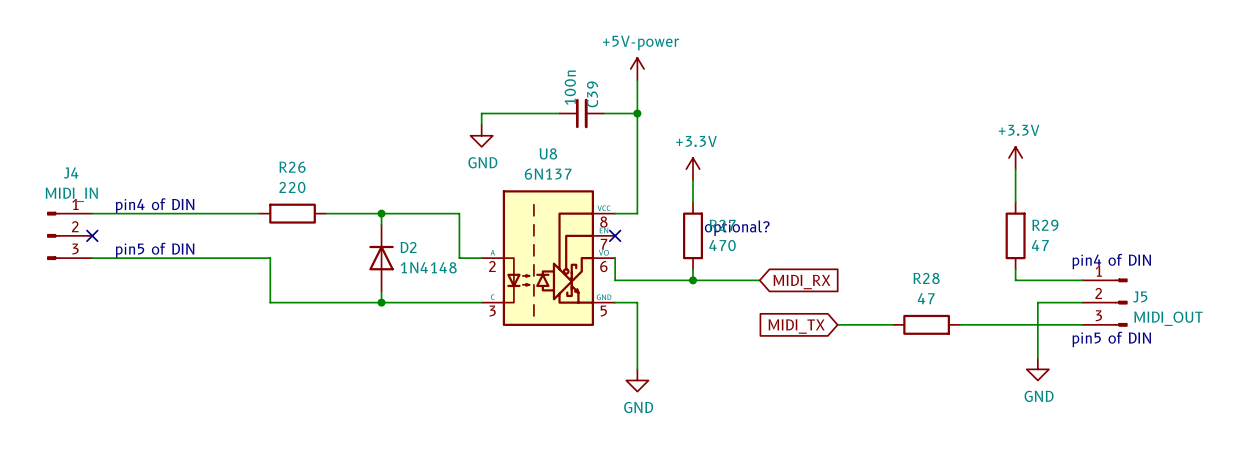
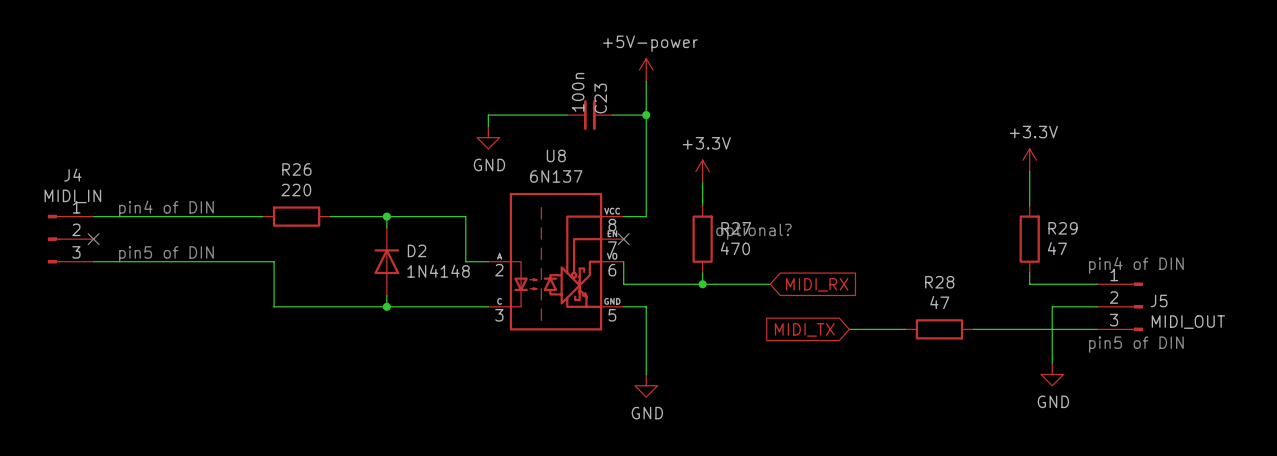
C39 name: C39 (592, 94) -> C23 (600, 98)

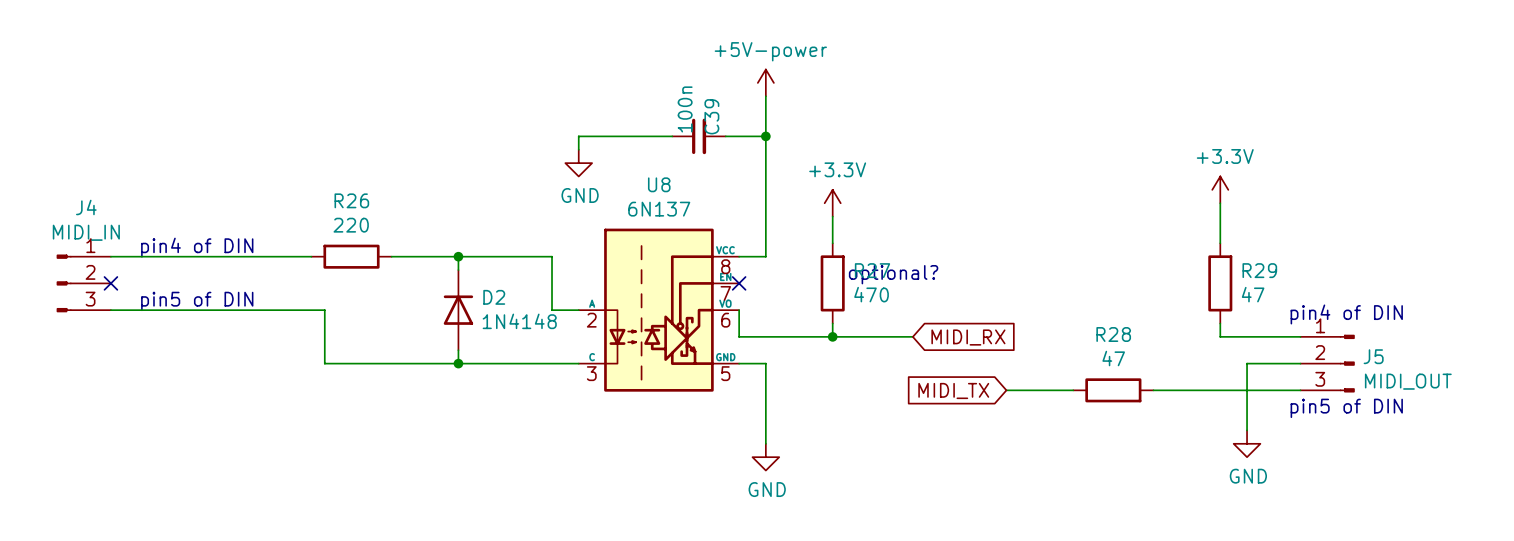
C23 name: C23 (600, 98) -> C39 (711, 116)

